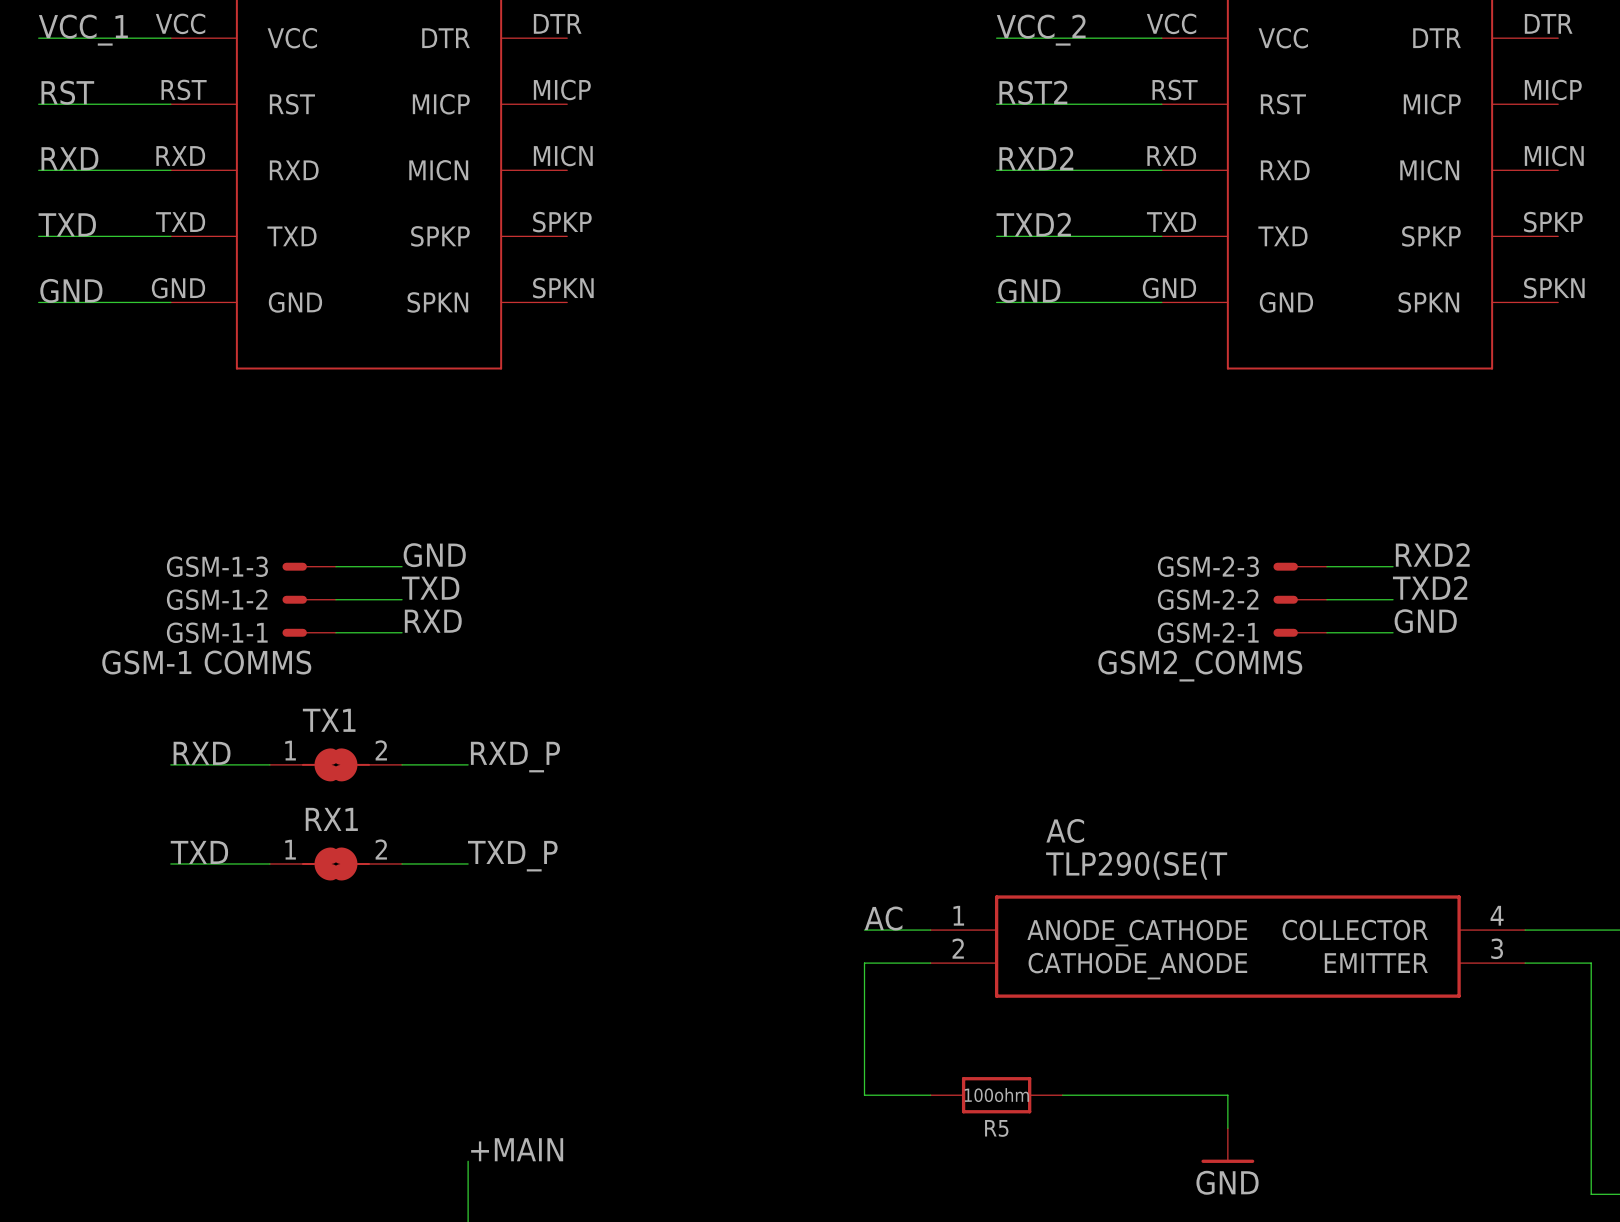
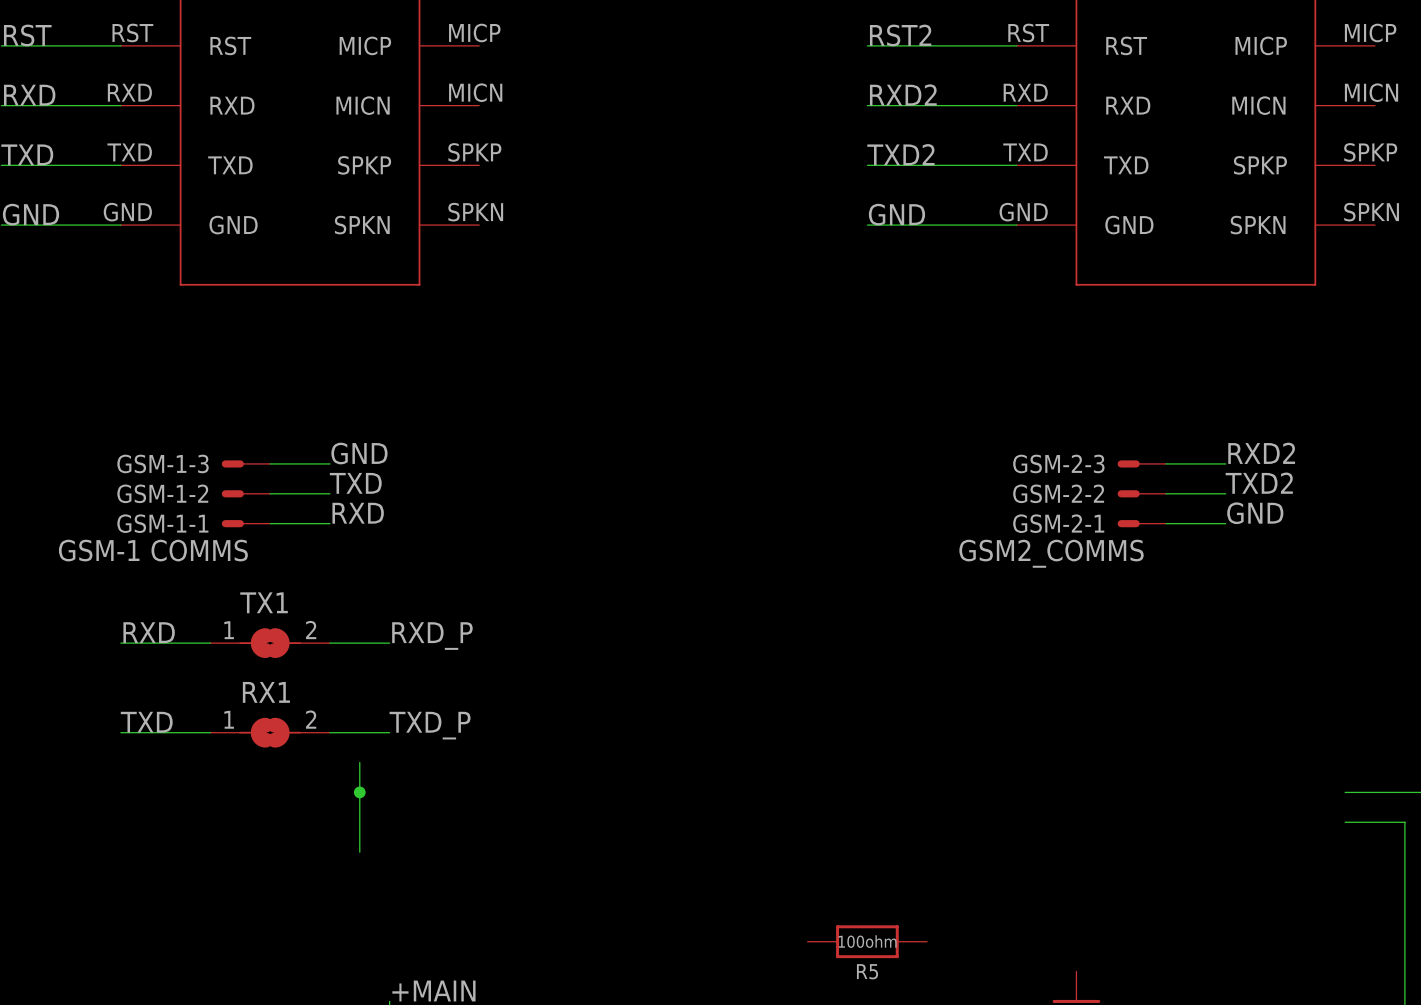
wire: none -> (359, 762) (359, 852)
label: AC (883, 918) -> none
junction: none -> (359, 792)
wire: (864, 930) (930, 930) -> none
AC: TLP290(SE(T (1227, 946) -> none
wire: (930, 963) (864, 963) (864, 1095) (930, 1095) -> none
wire: (1062, 1095) (1227, 1095) (1227, 1128) -> none

